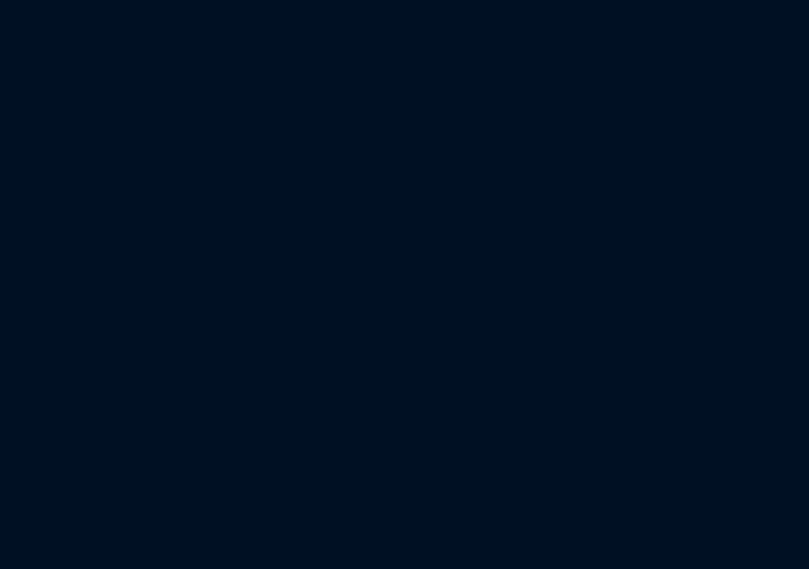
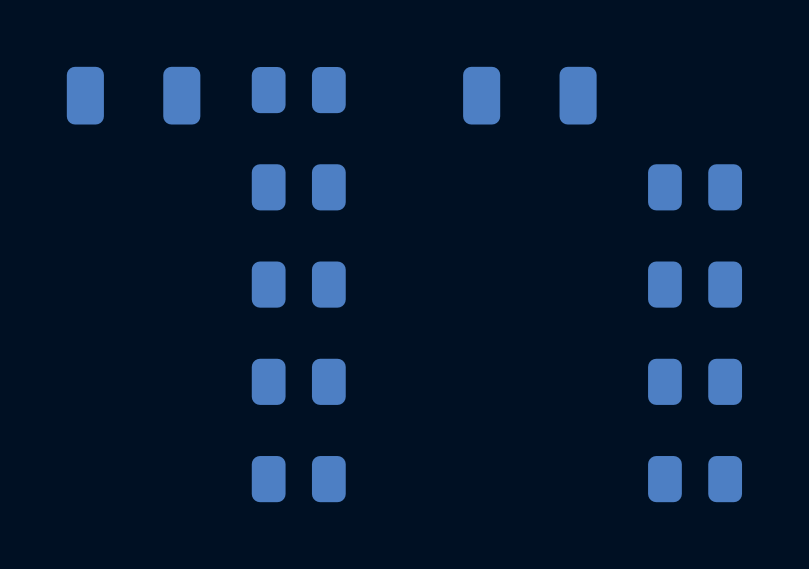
part: none -> (298, 90)
part: none -> (133, 95)
part: none -> (529, 95)
part: none -> (298, 187)
part: none -> (695, 187)
part: none -> (298, 284)
part: none -> (695, 284)
part: none -> (298, 381)
part: none -> (695, 381)
part: none -> (298, 479)
part: none -> (695, 479)

